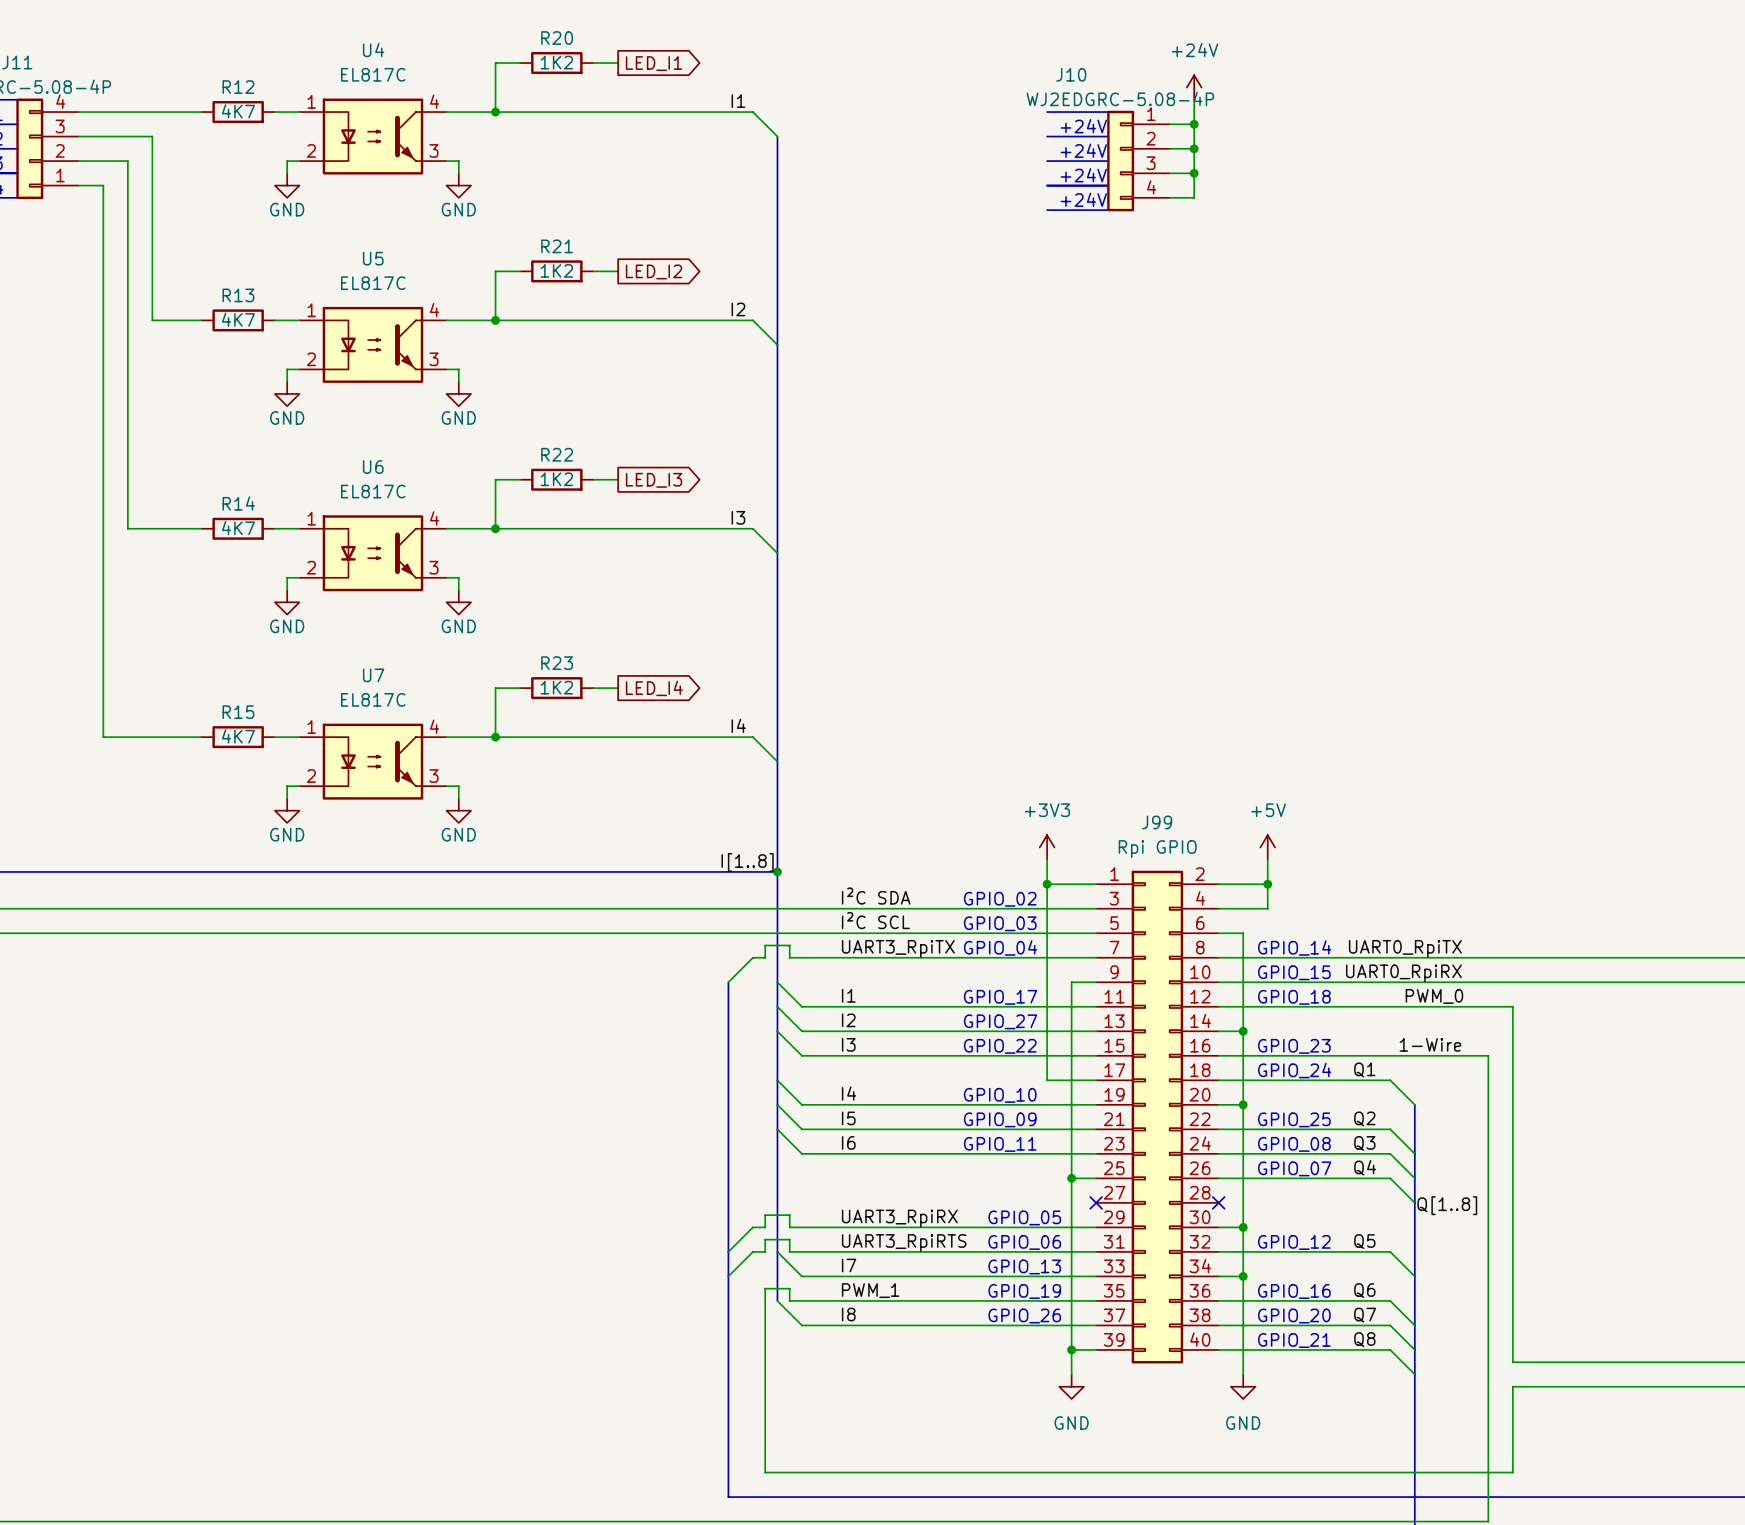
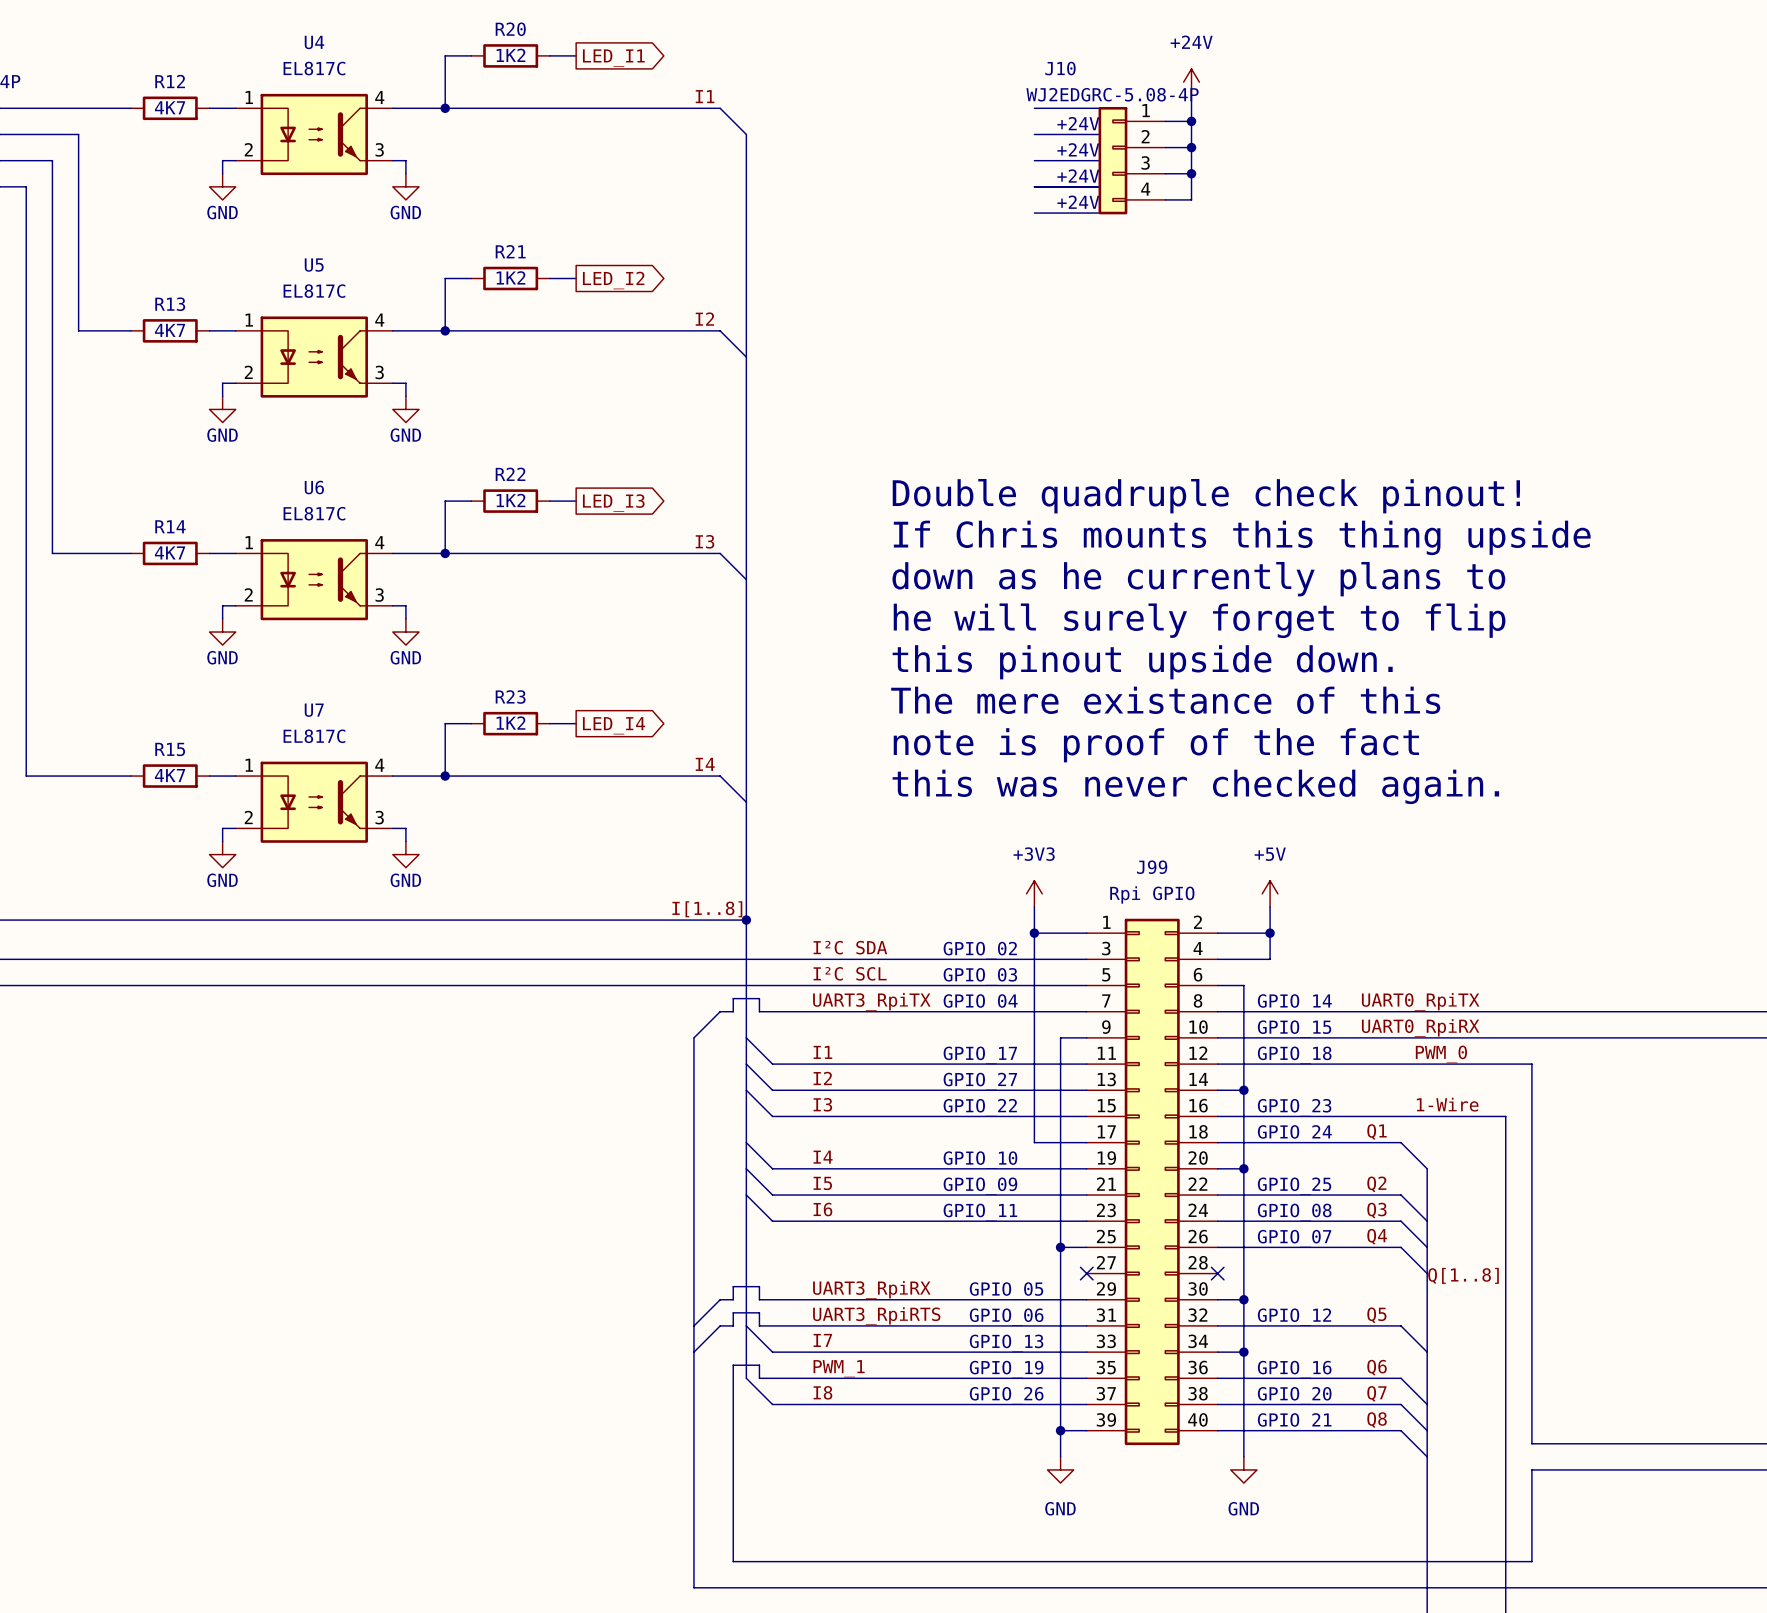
text: none -> Double quadruple check pinout! (1206, 496)
text: none -> If Chris mounts this thing upside (1242, 537)
text: none -> down as he currently plans to (1198, 579)
text: none -> he will surely forget to flip (1199, 620)
text: none -> this pinout upside down. (1142, 662)
text: none -> The mere existance of this (1165, 700)
text: none -> note is proof of the fact (1156, 745)
text: none -> this was never checked again. (1195, 786)

